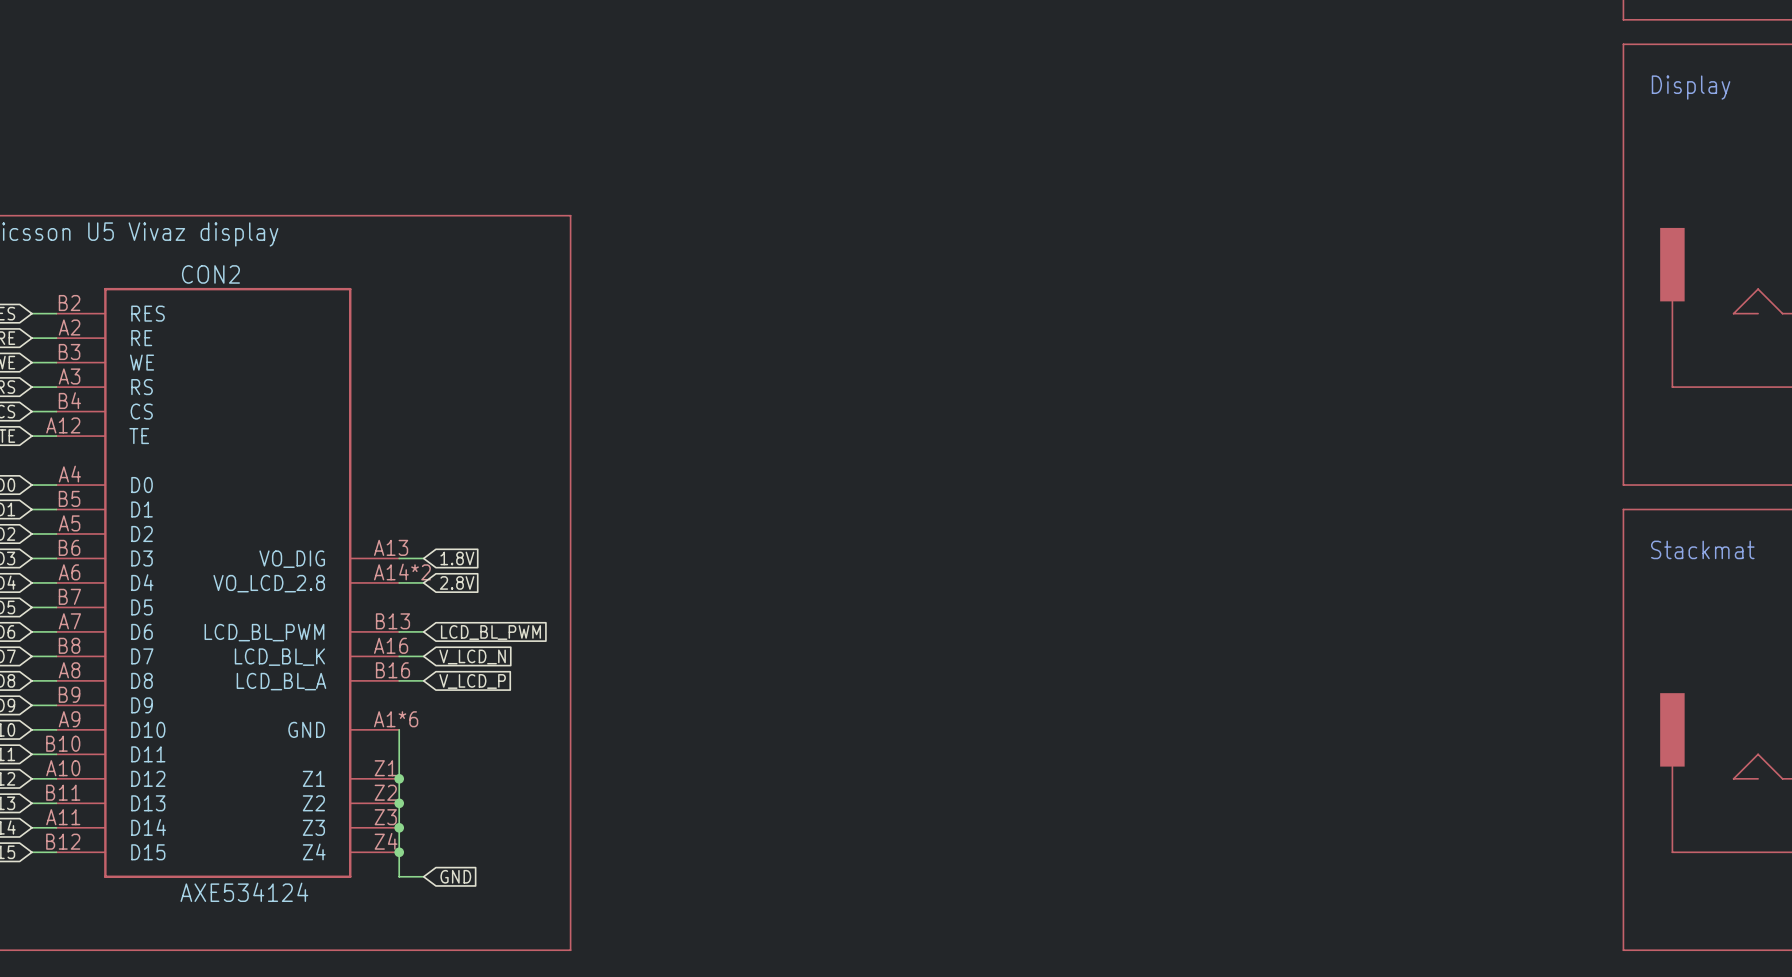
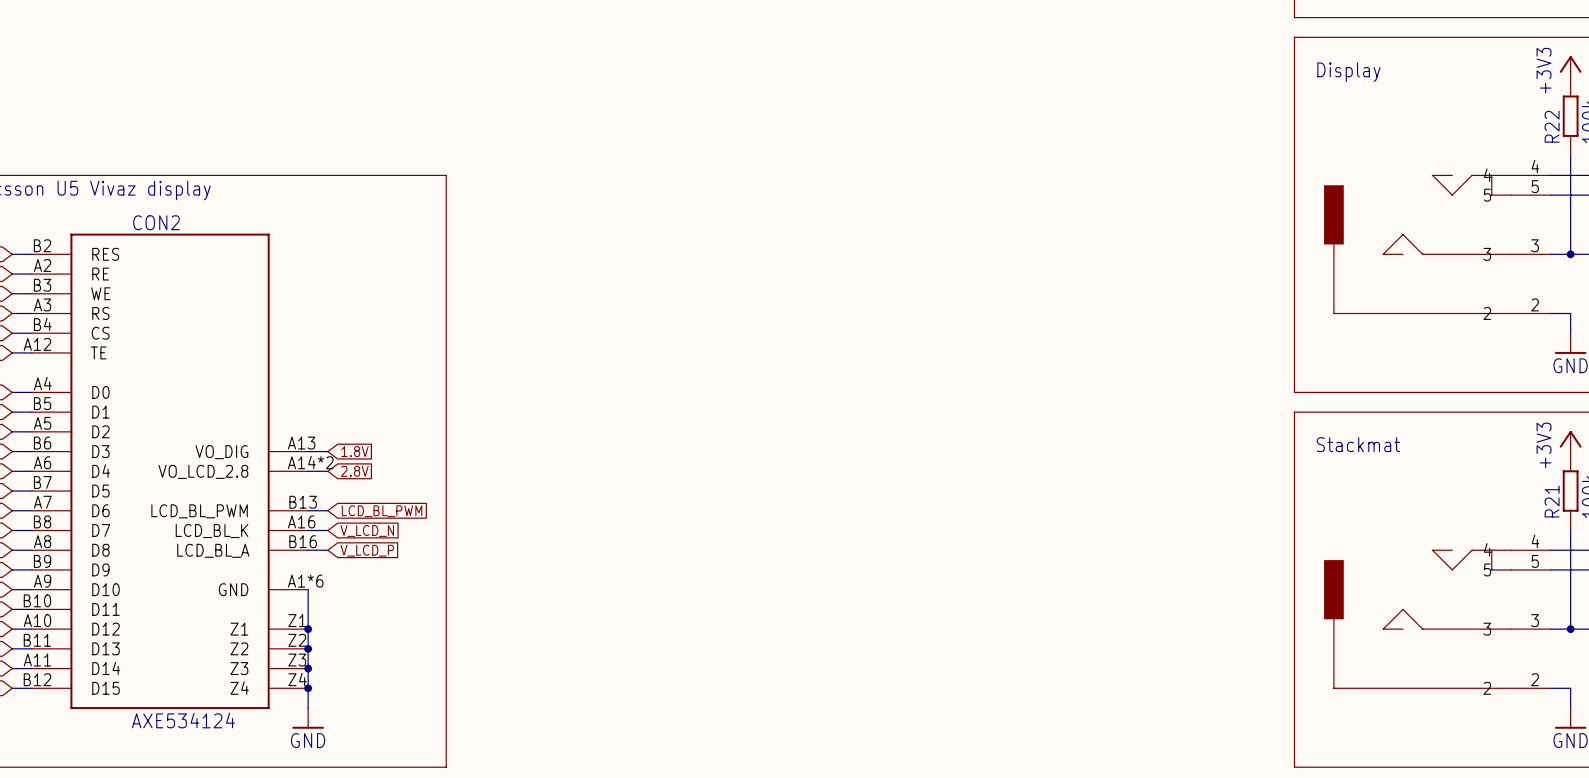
wire: (399, 876) (423, 876) -> none
global label: GND (455, 876) -> none
power symbol: none -> GND (308, 718)

